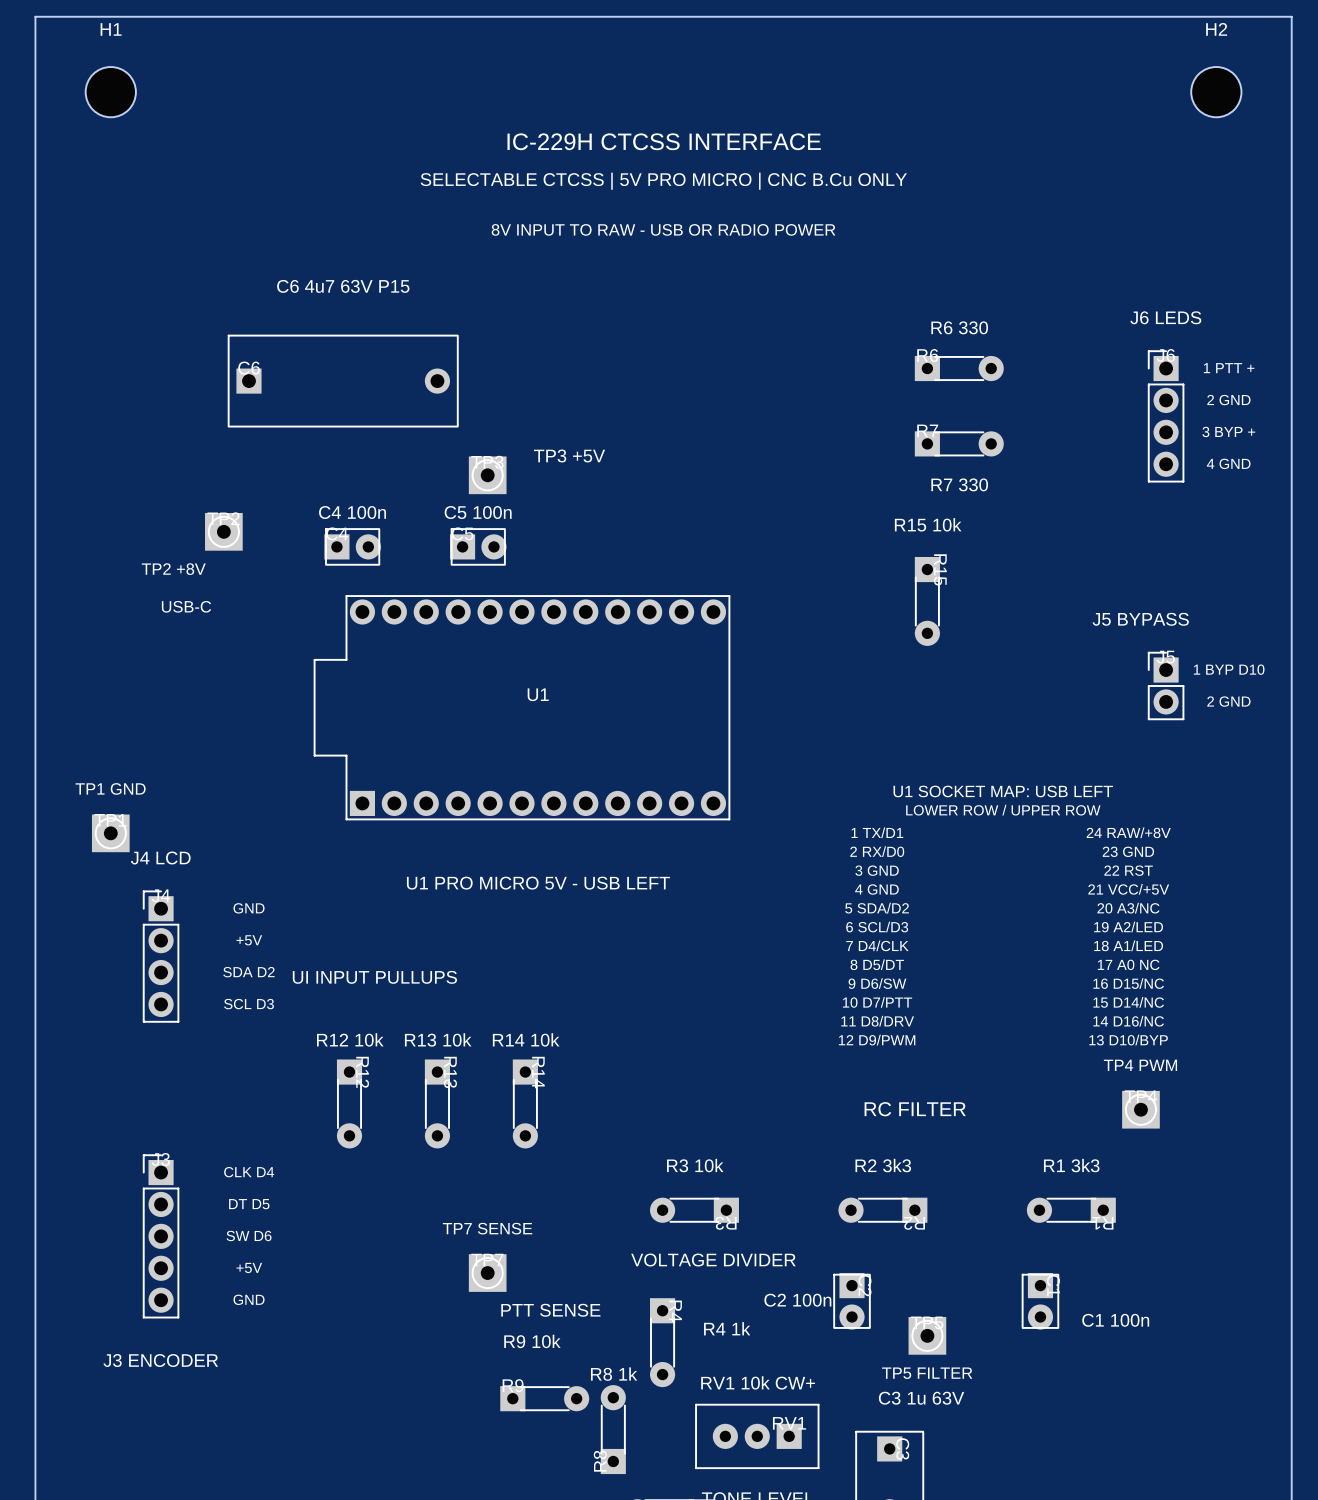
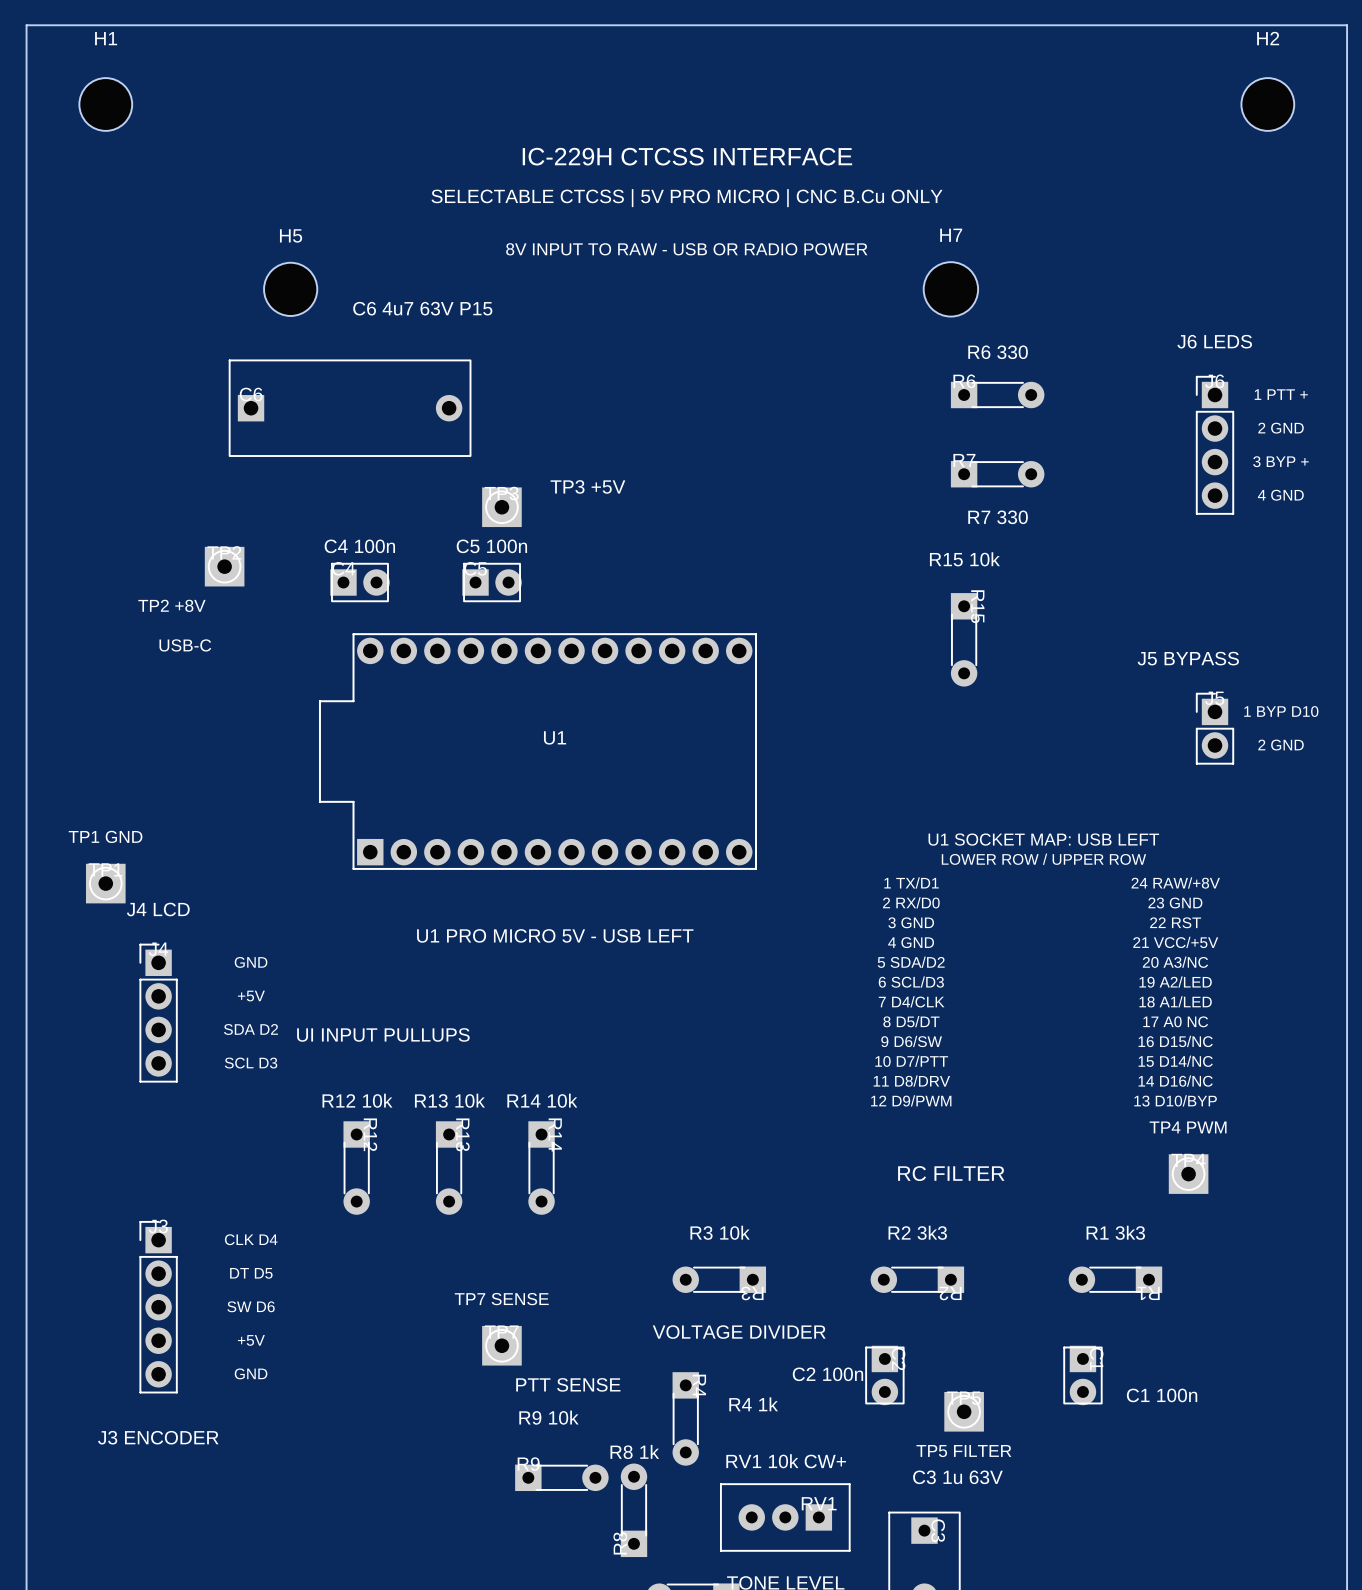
H5: none -> (290, 289)
H7: none -> (950, 289)
text position: C6 4u7 63V P15 (343, 286) -> C6 4u7 63V P15 (422, 308)

